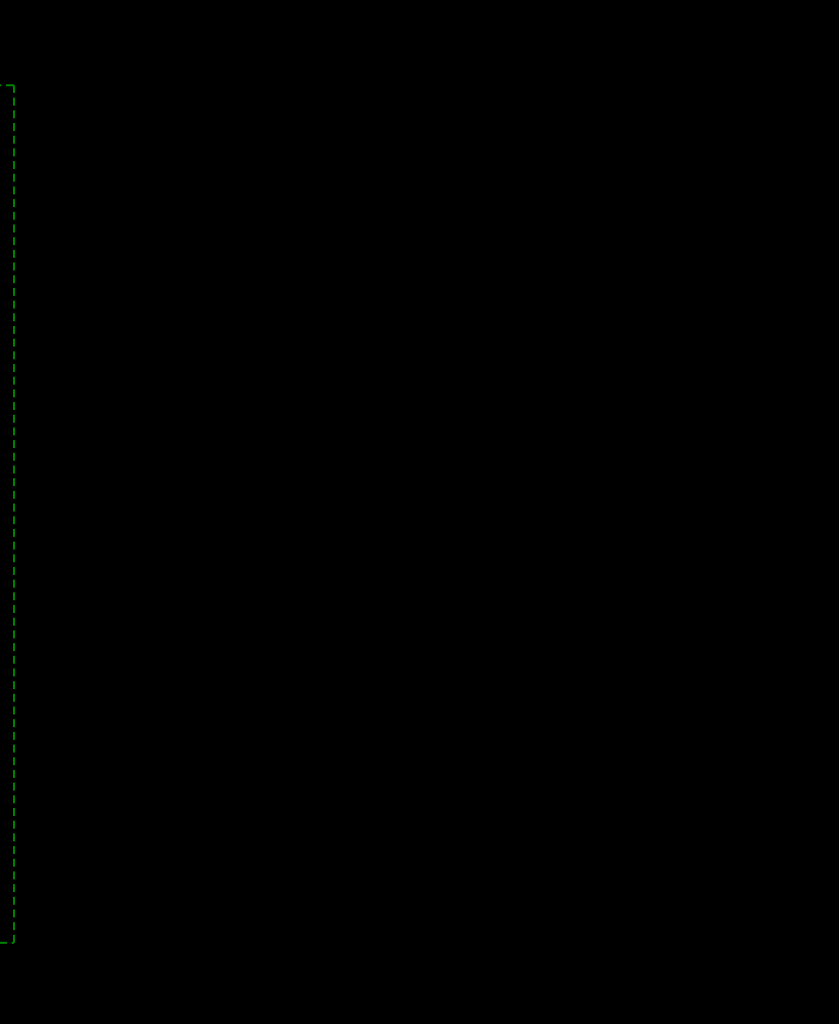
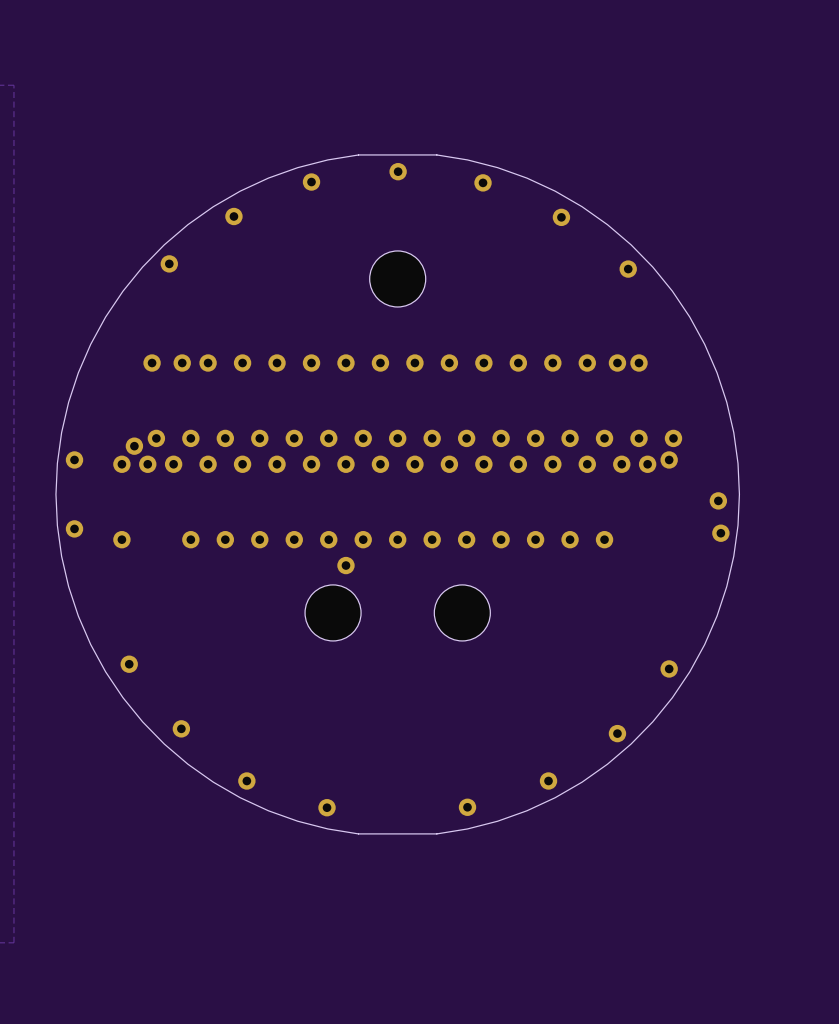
board edge: none -> (436, 154) (358, 154) (297, 167) (240, 191) (187, 224) (142, 267) (105, 316) (90, 344) (68, 402) (57, 463) (57, 525) (68, 586) (90, 644) (122, 697) (164, 744) (187, 764) (240, 797) (297, 821) (358, 833) (436, 833) (497, 821) (555, 797) (607, 764) (652, 721) (689, 671) (704, 644) (726, 586) (738, 525) (738, 463) (726, 402) (704, 344) (672, 291) (631, 244) (607, 224) (555, 191) (497, 167) (436, 154)
via: none -> (398, 171)
via: none -> (311, 182)
via: none -> (483, 182)
via: none -> (233, 216)
via: none -> (561, 217)
via: none -> (169, 263)
via: none -> (628, 269)
hole: none -> (397, 278)
via: none -> (152, 363)
via: none -> (182, 363)
via: none -> (208, 363)
via: none -> (242, 363)
via: none -> (277, 363)
via: none -> (311, 363)
via: none -> (345, 363)
via: none -> (380, 363)
via: none -> (414, 363)
via: none -> (449, 363)
via: none -> (483, 363)
via: none -> (518, 363)
via: none -> (552, 363)
via: none -> (587, 363)
via: none -> (617, 363)
via: none -> (639, 363)
via: none -> (156, 438)
via: none -> (190, 438)
via: none -> (225, 438)
via: none -> (259, 438)
via: none -> (294, 438)
via: none -> (328, 438)
via: none -> (363, 438)
via: none -> (397, 438)
via: none -> (432, 438)
via: none -> (466, 438)
via: none -> (501, 438)
via: none -> (535, 438)
via: none -> (570, 438)
via: none -> (604, 438)
via: none -> (639, 438)
via: none -> (673, 438)
via: none -> (134, 446)
via: none -> (74, 459)
via: none -> (669, 459)
via: none -> (121, 464)
via: none -> (147, 464)
via: none -> (173, 464)
via: none -> (208, 464)
via: none -> (242, 464)
via: none -> (277, 464)
via: none -> (311, 464)
via: none -> (345, 464)
via: none -> (380, 464)
via: none -> (414, 464)
via: none -> (449, 464)
via: none -> (483, 464)
via: none -> (518, 464)
via: none -> (552, 464)
via: none -> (587, 464)
via: none -> (621, 464)
via: none -> (647, 464)
via: none -> (718, 500)
via: none -> (74, 528)
via: none -> (720, 533)
via: none -> (121, 539)
via: none -> (190, 539)
via: none -> (225, 539)
via: none -> (259, 539)
via: none -> (294, 539)
via: none -> (328, 539)
via: none -> (363, 539)
via: none -> (397, 539)
via: none -> (432, 539)
via: none -> (466, 539)
via: none -> (501, 539)
via: none -> (535, 539)
via: none -> (570, 539)
via: none -> (604, 539)
via: none -> (345, 565)
hole: none -> (333, 612)
hole: none -> (462, 612)
via: none -> (129, 664)
via: none -> (669, 668)
via: none -> (181, 728)
via: none -> (617, 733)
via: none -> (246, 780)
via: none -> (548, 780)
via: none -> (327, 807)
via: none -> (467, 807)

